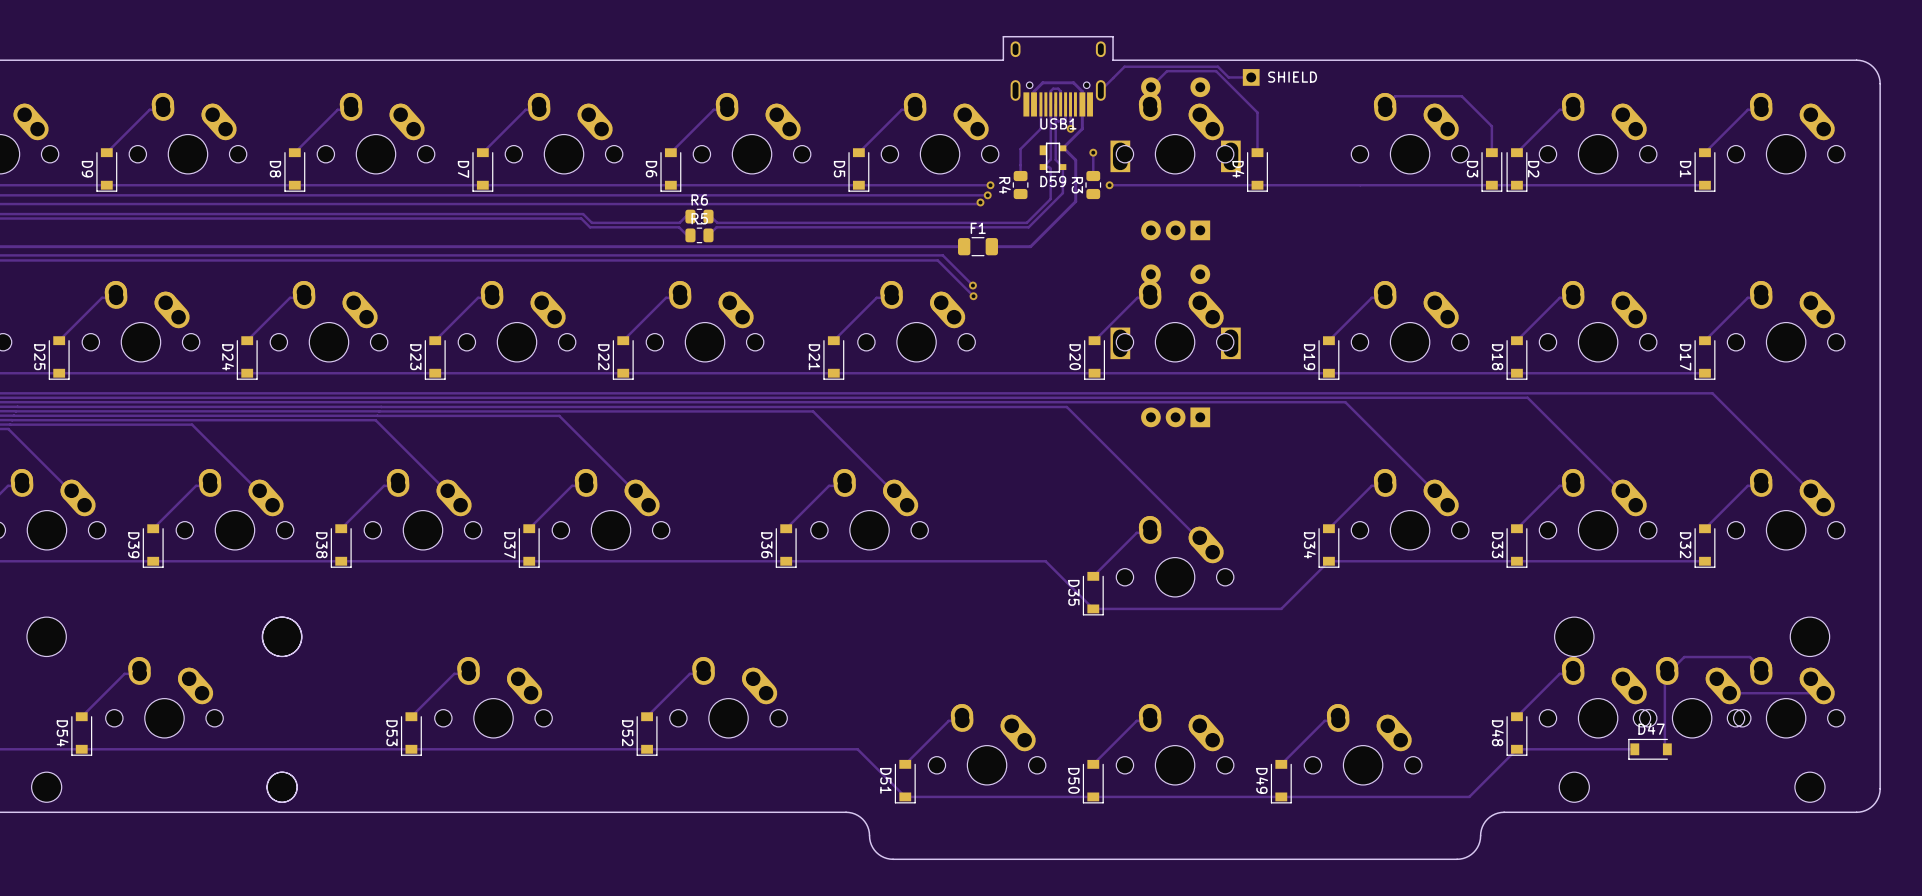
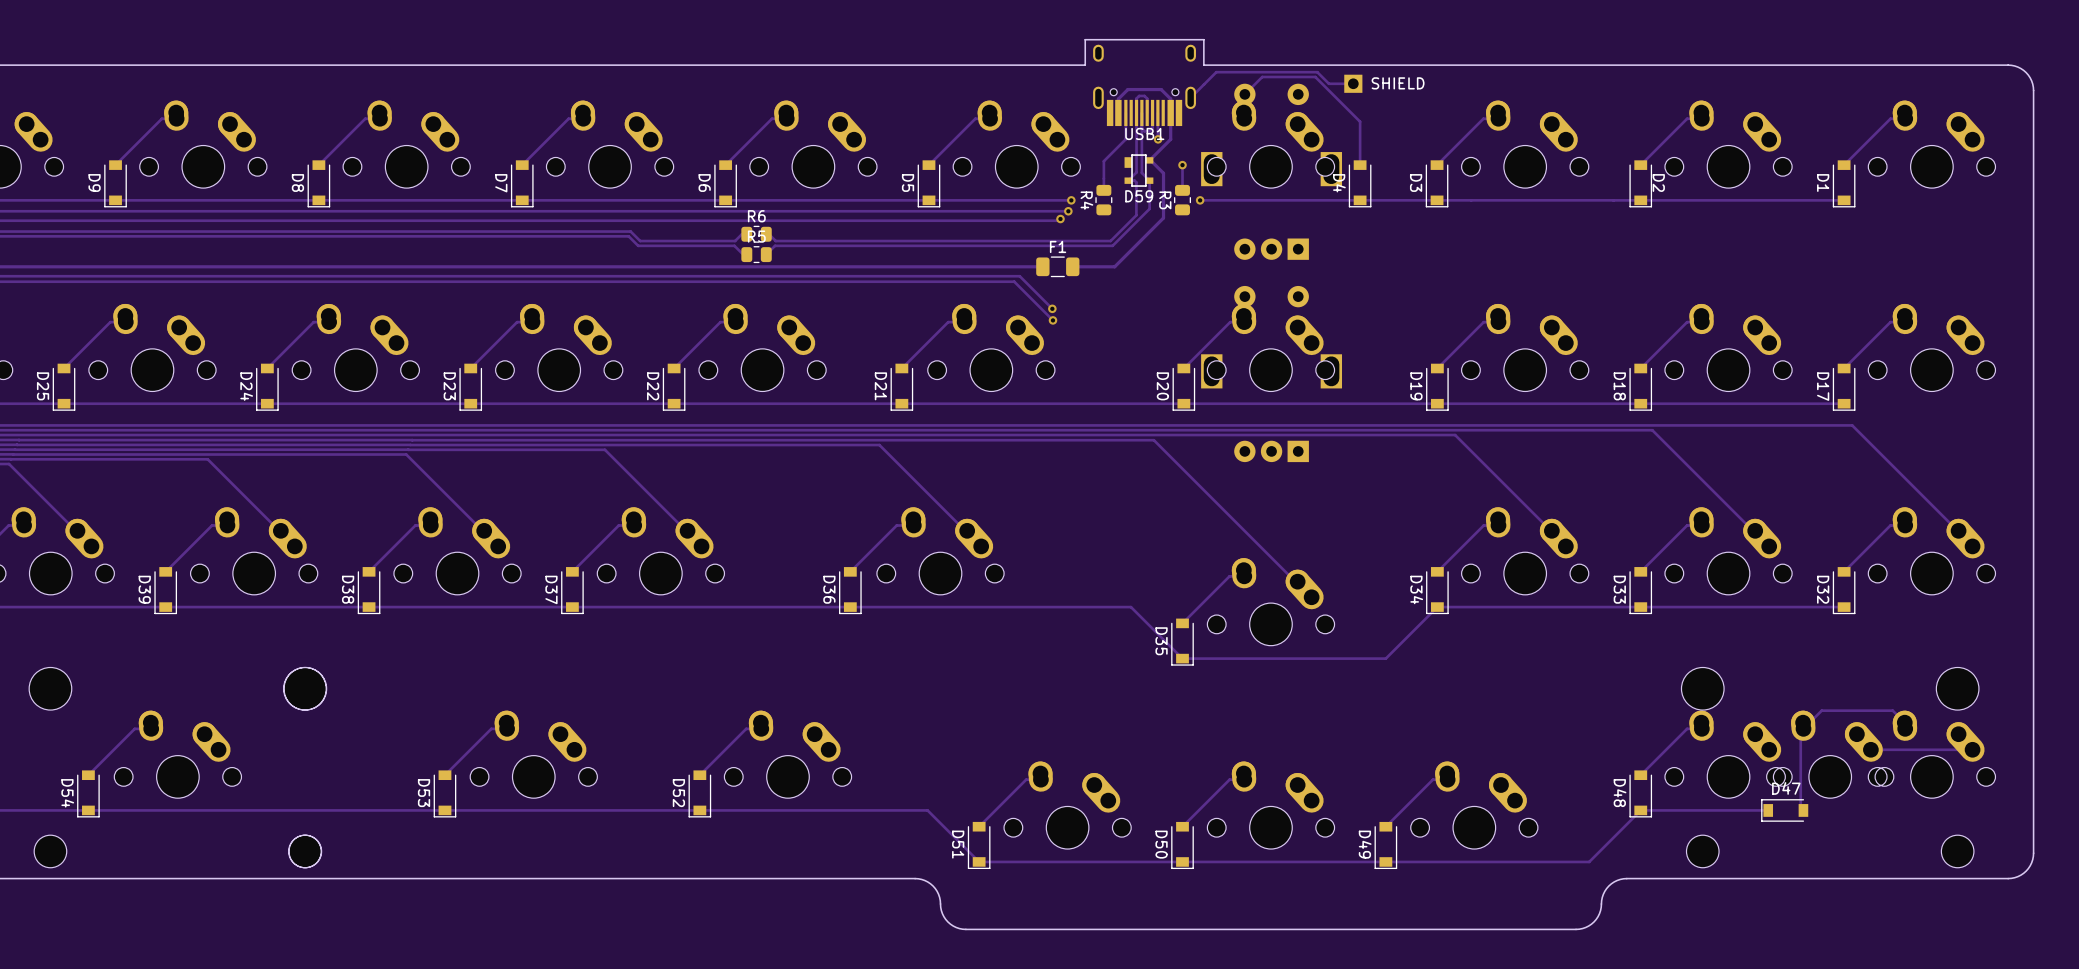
track: (1385, 109) (1385, 106) (1395, 96) (1461, 96) (1491, 126) (1491, 152) -> (1498, 118) (1483, 118) (1437, 165)
D3 position: (1491, 169) -> (1437, 183)

